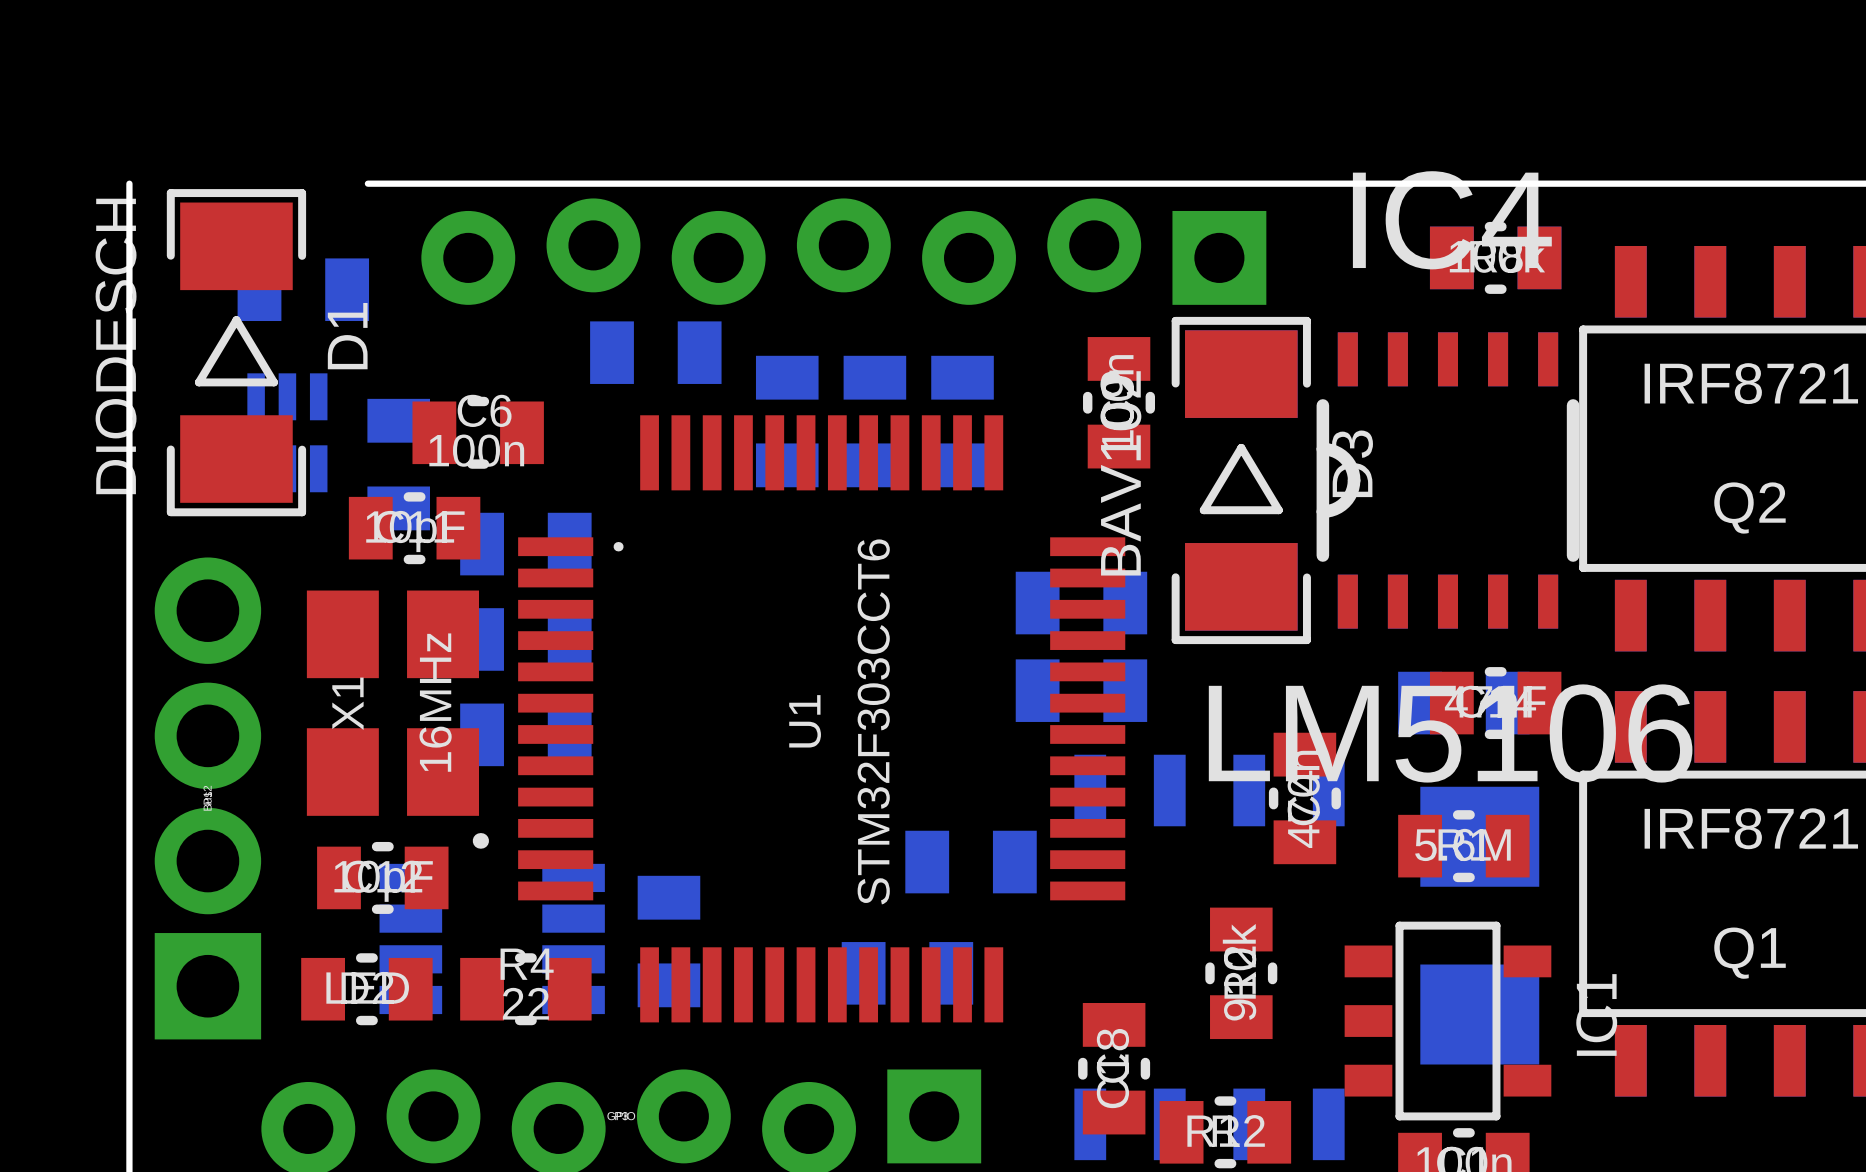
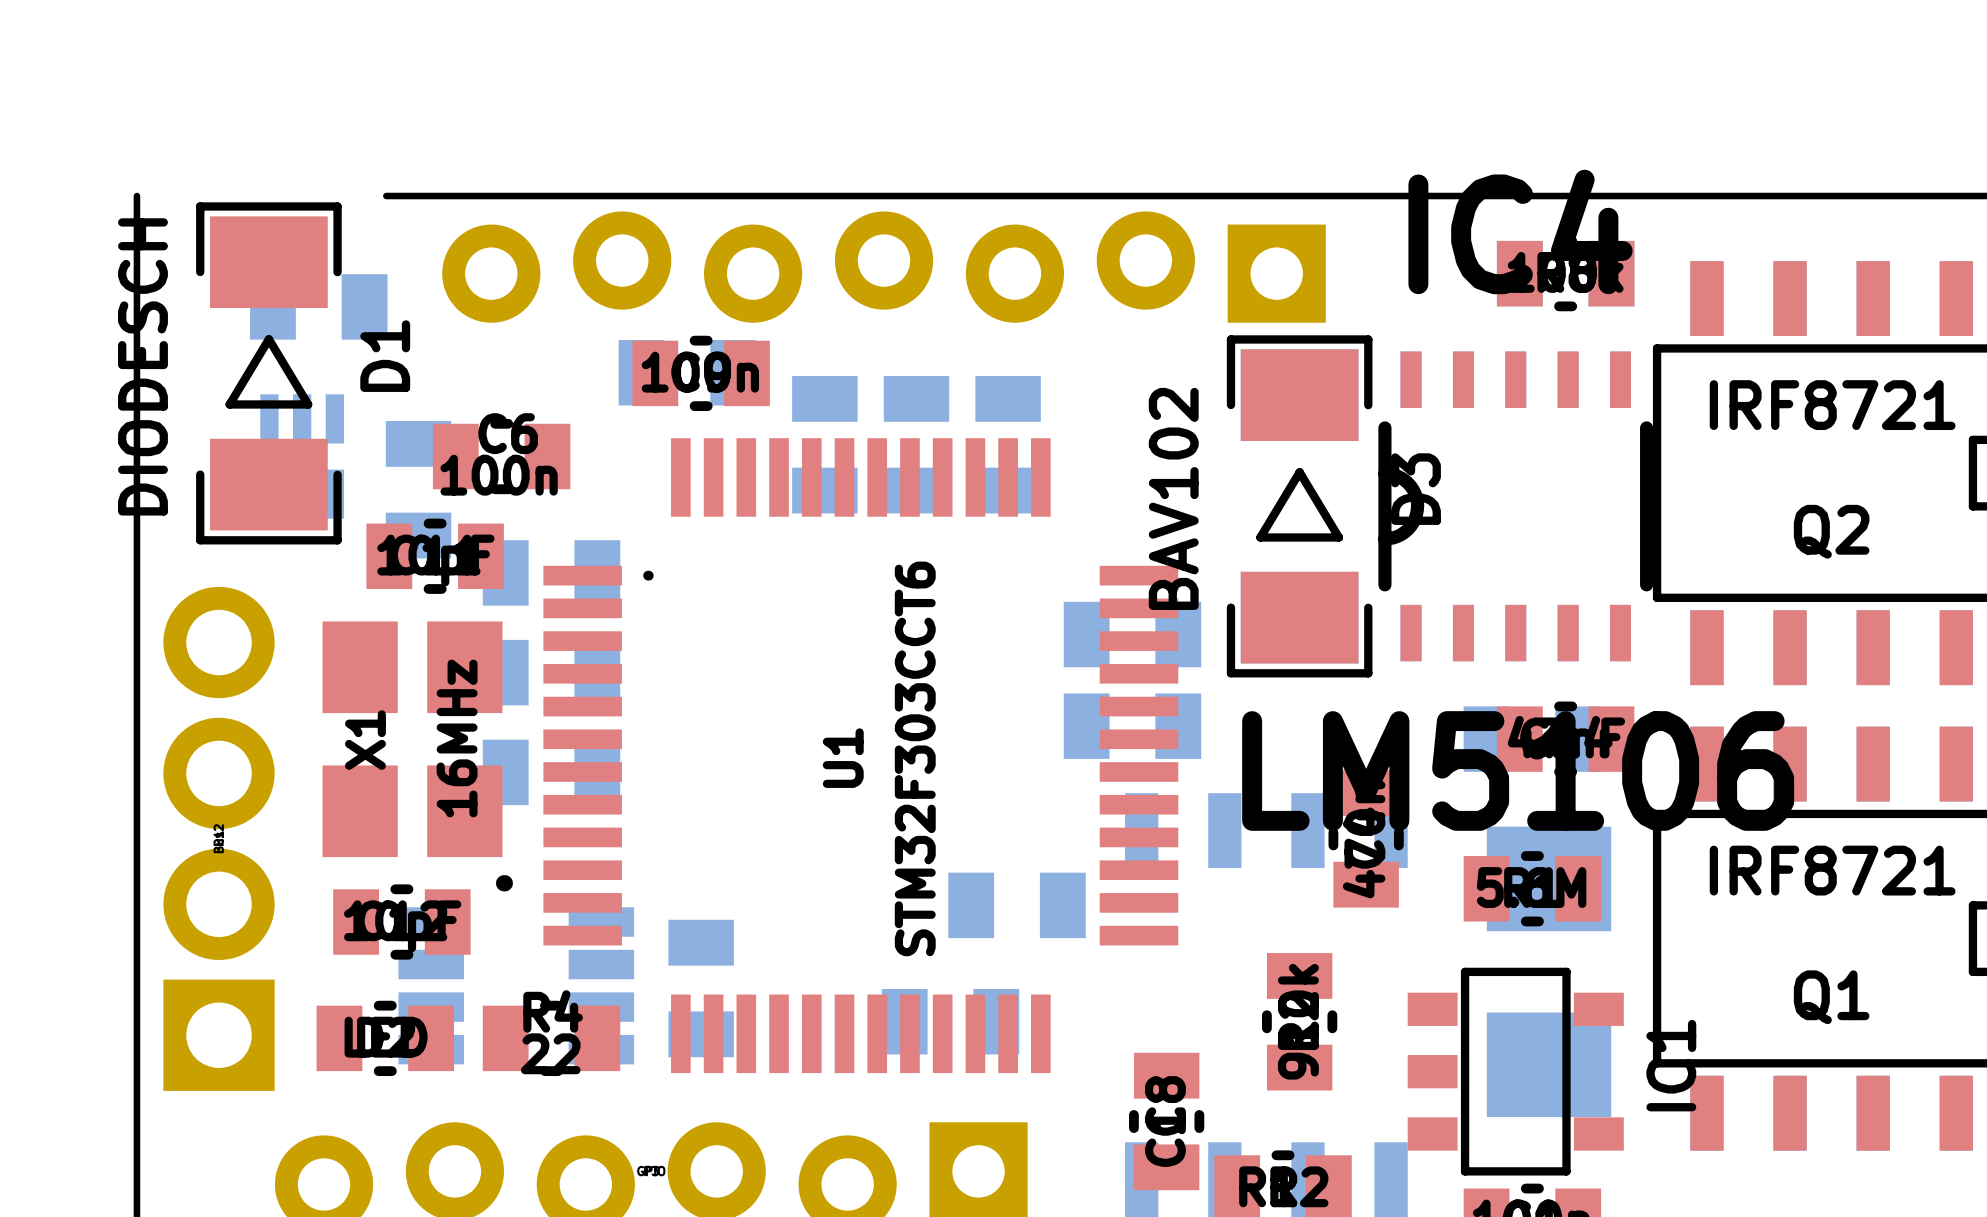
D1 position: (236, 352) -> (268, 373)
part rotation: 0° (1119, 402) -> 90° clockwise (701, 373)
part position: (1119, 402) -> (701, 373)

